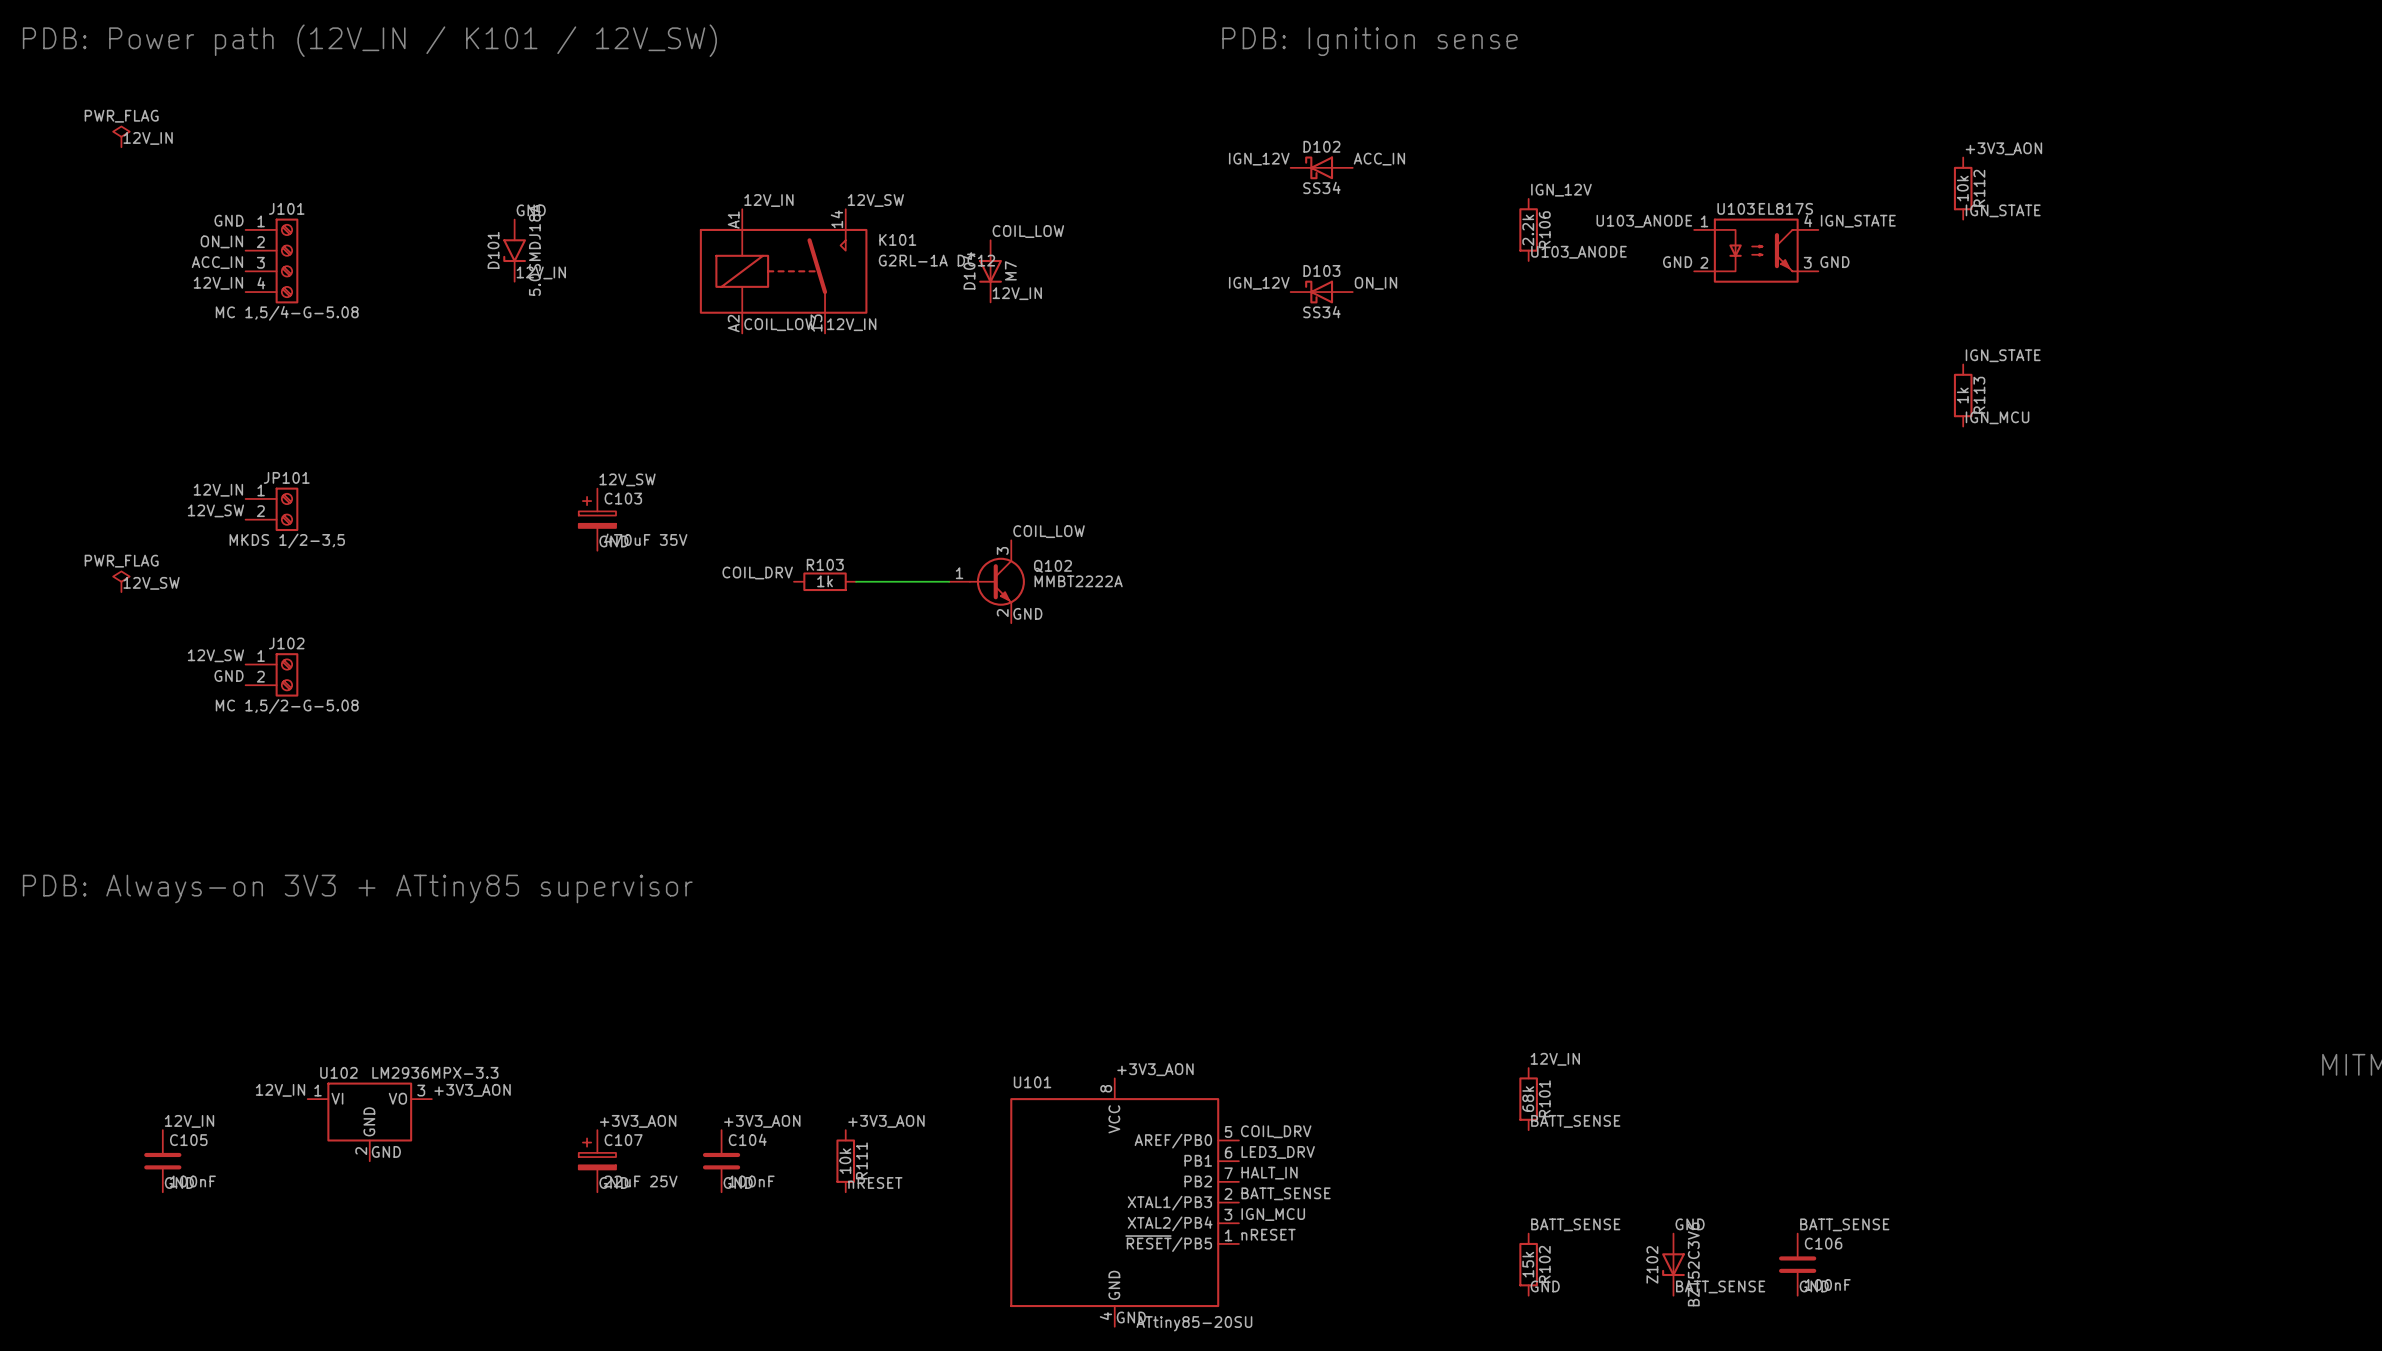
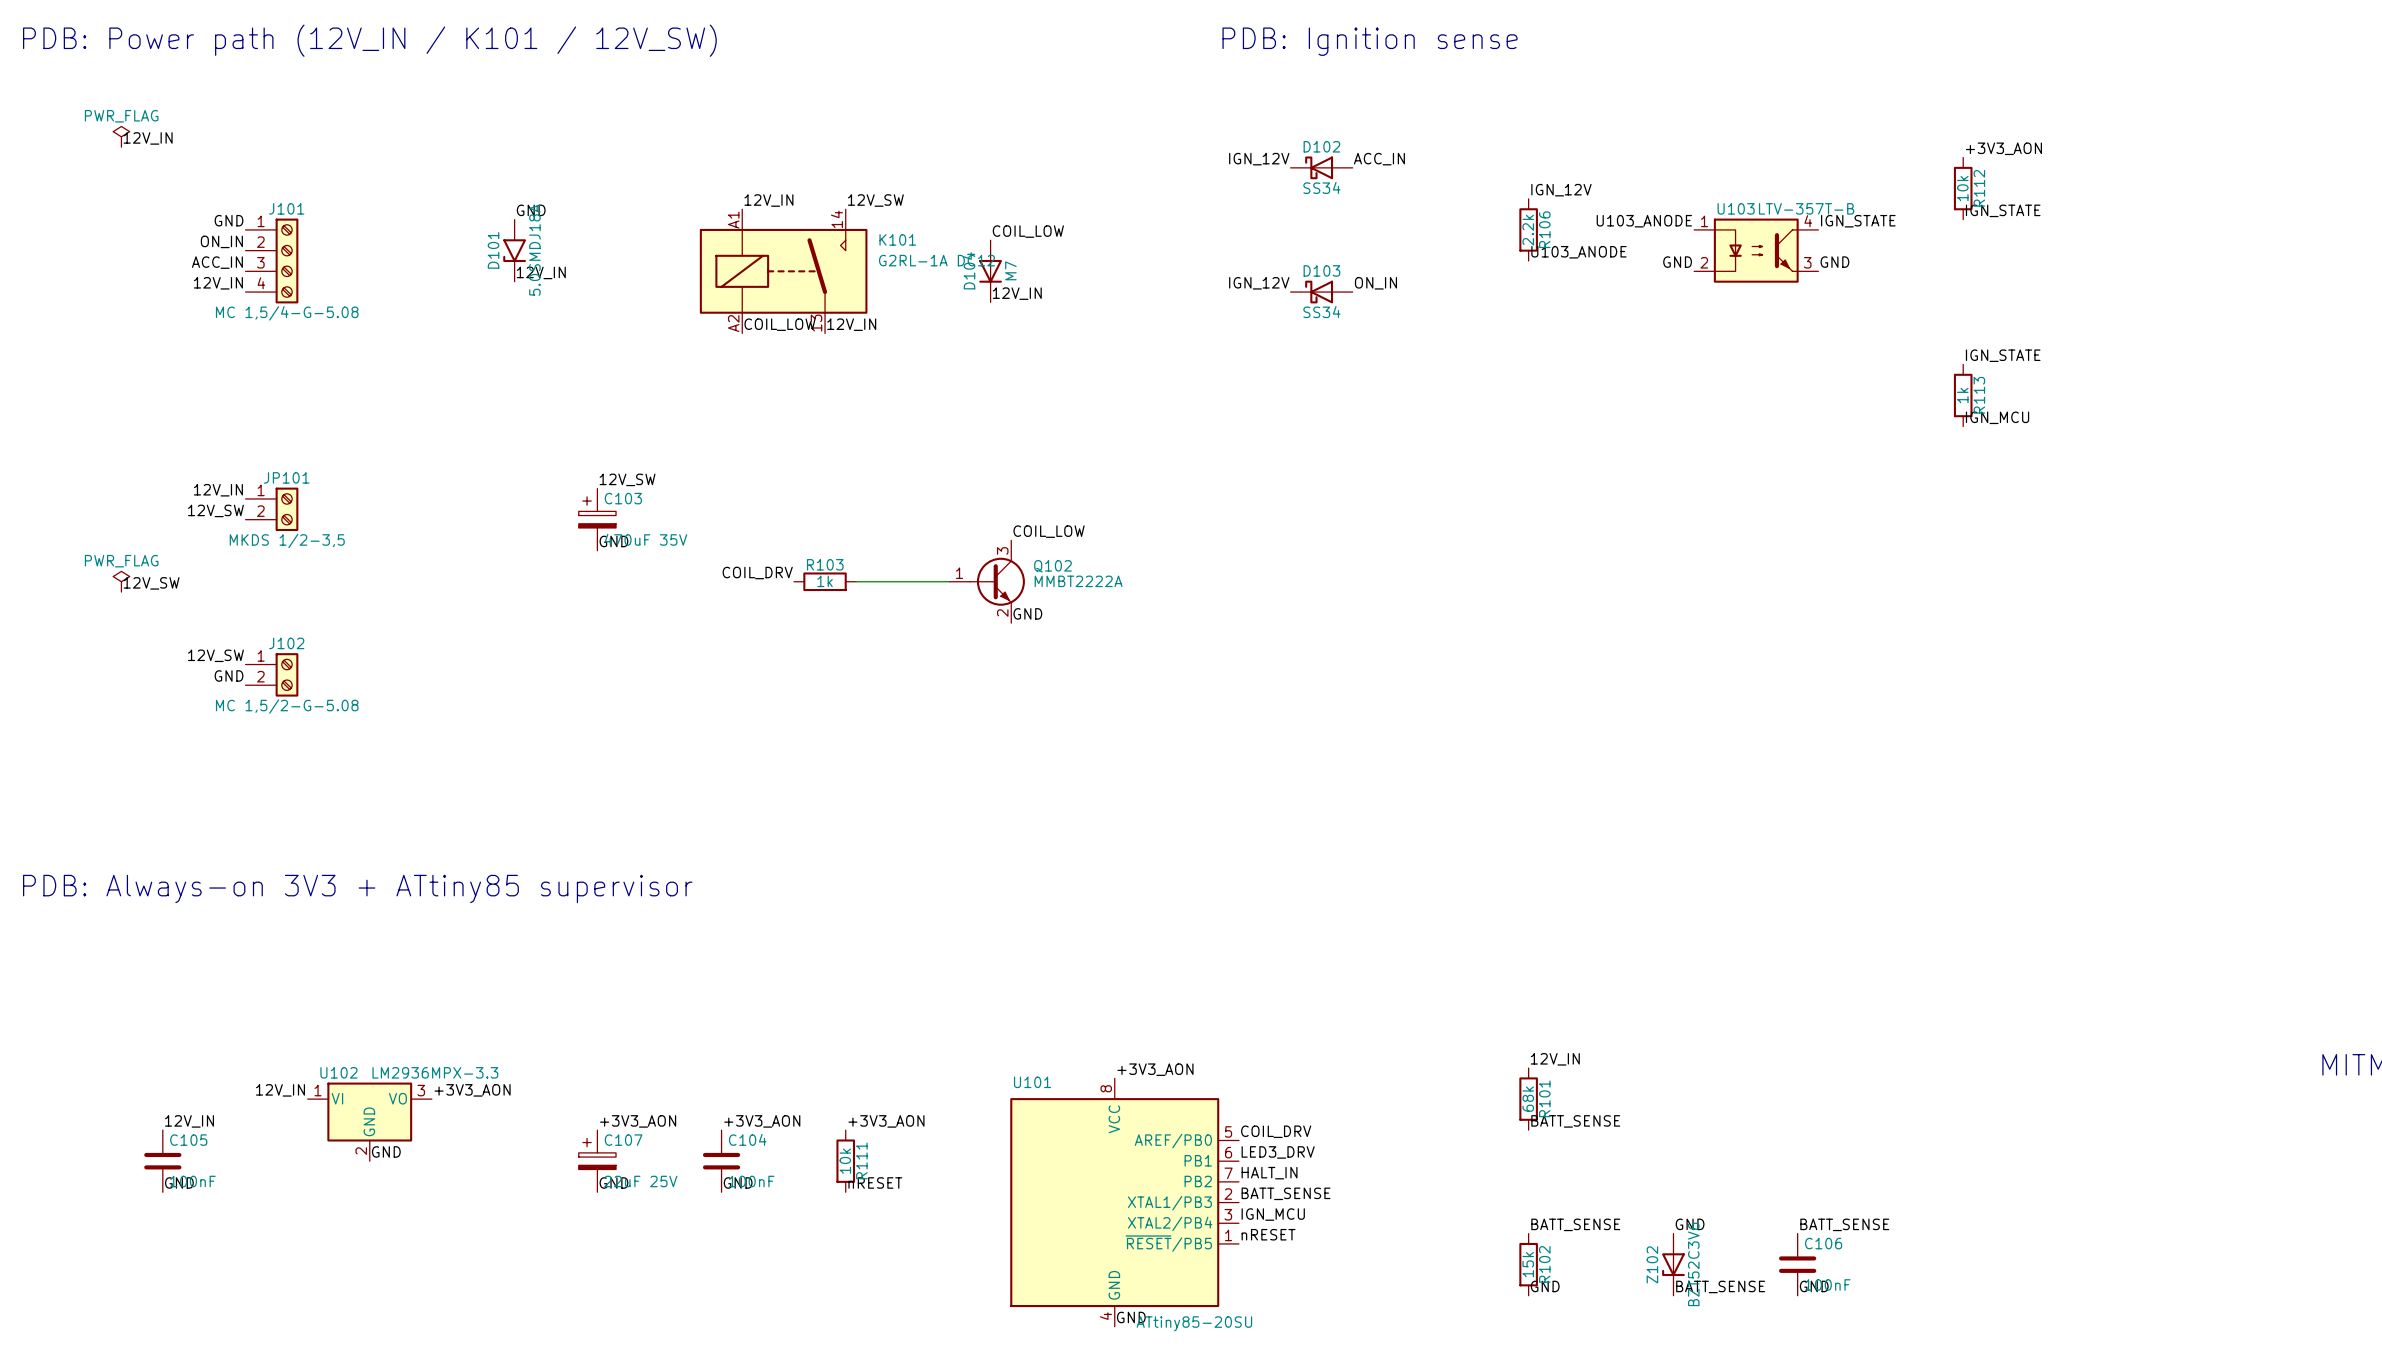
U103 value: EL817S (1785, 208) -> LTV-357T-B (1806, 208)

